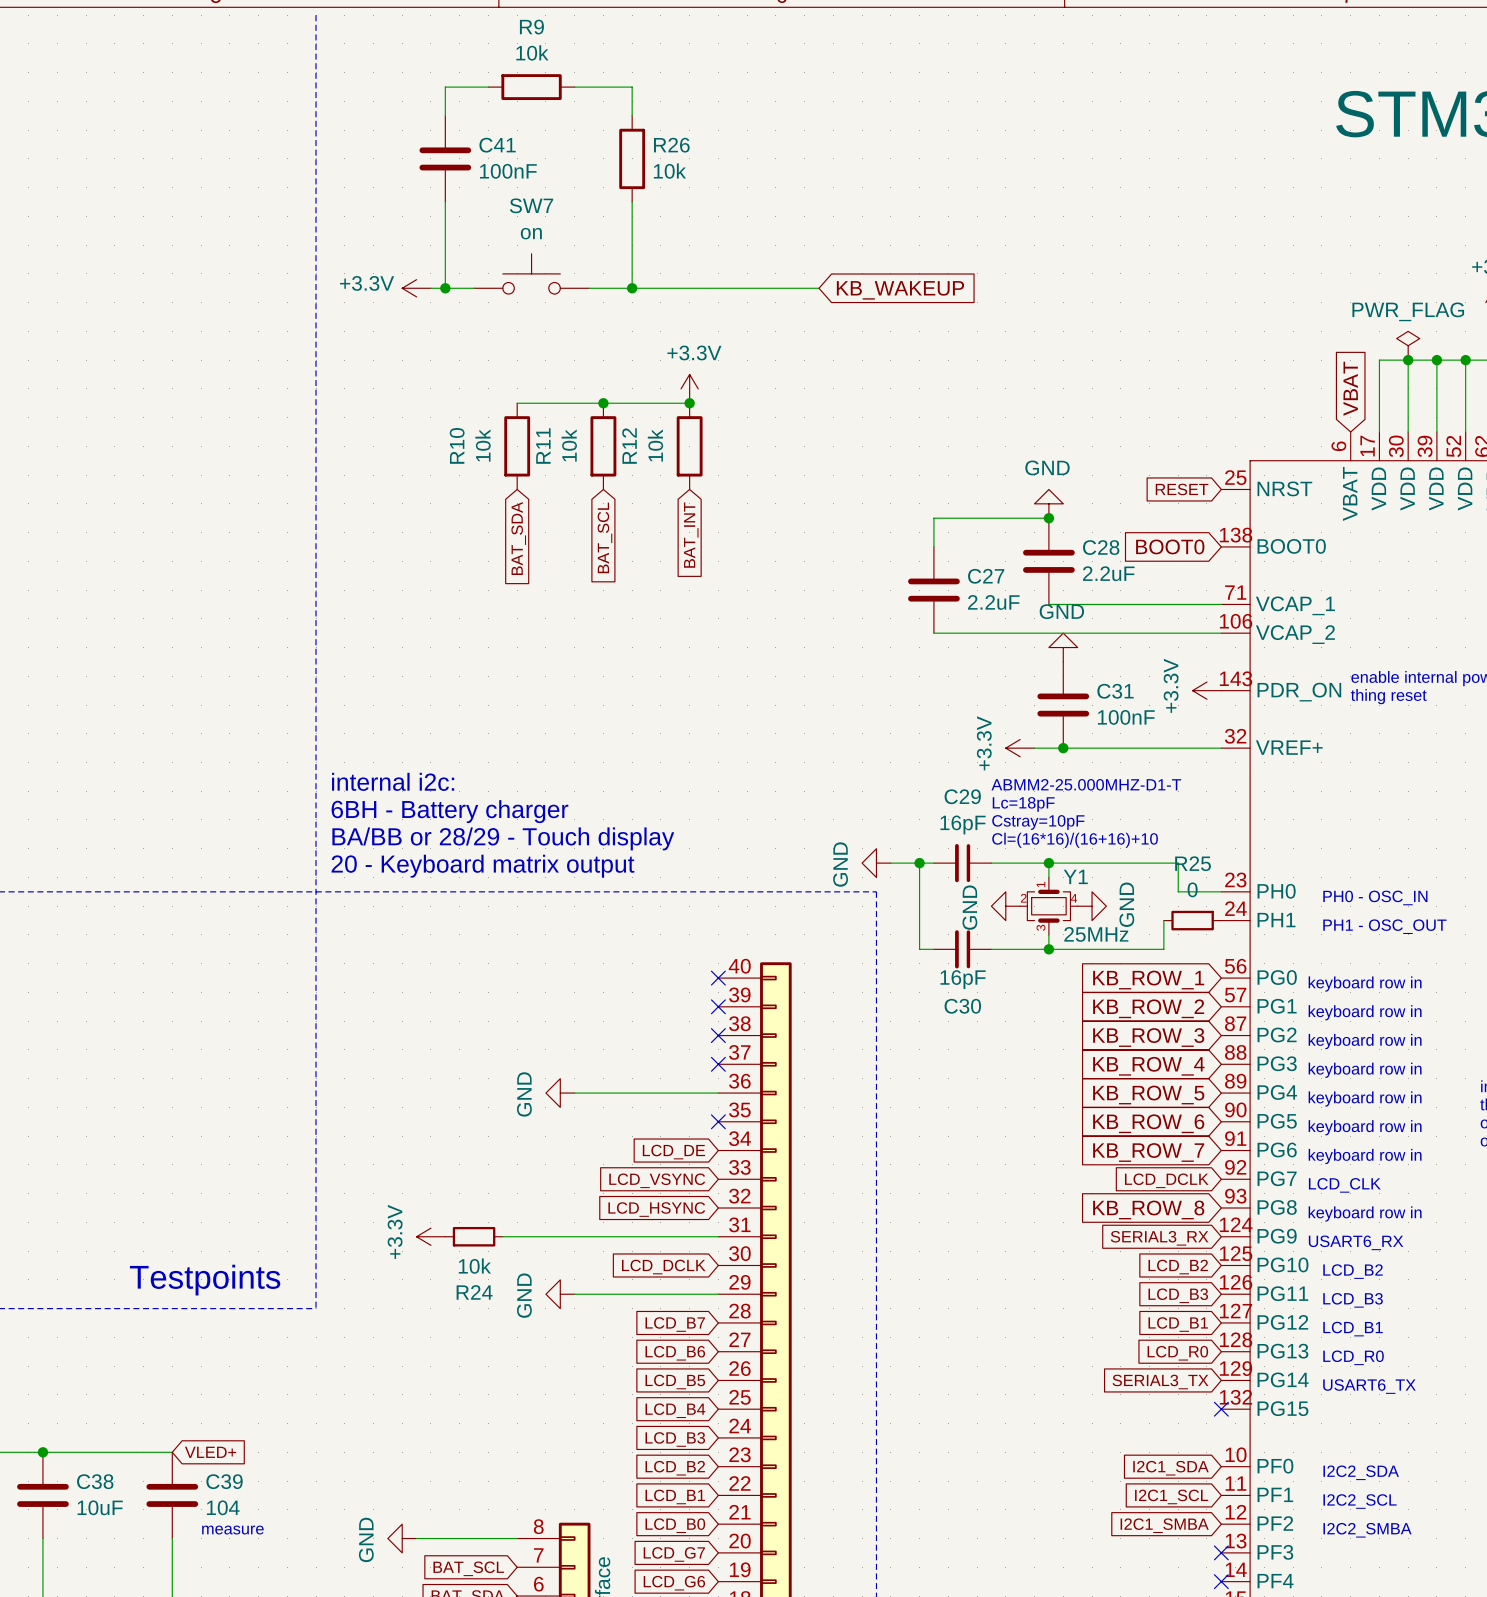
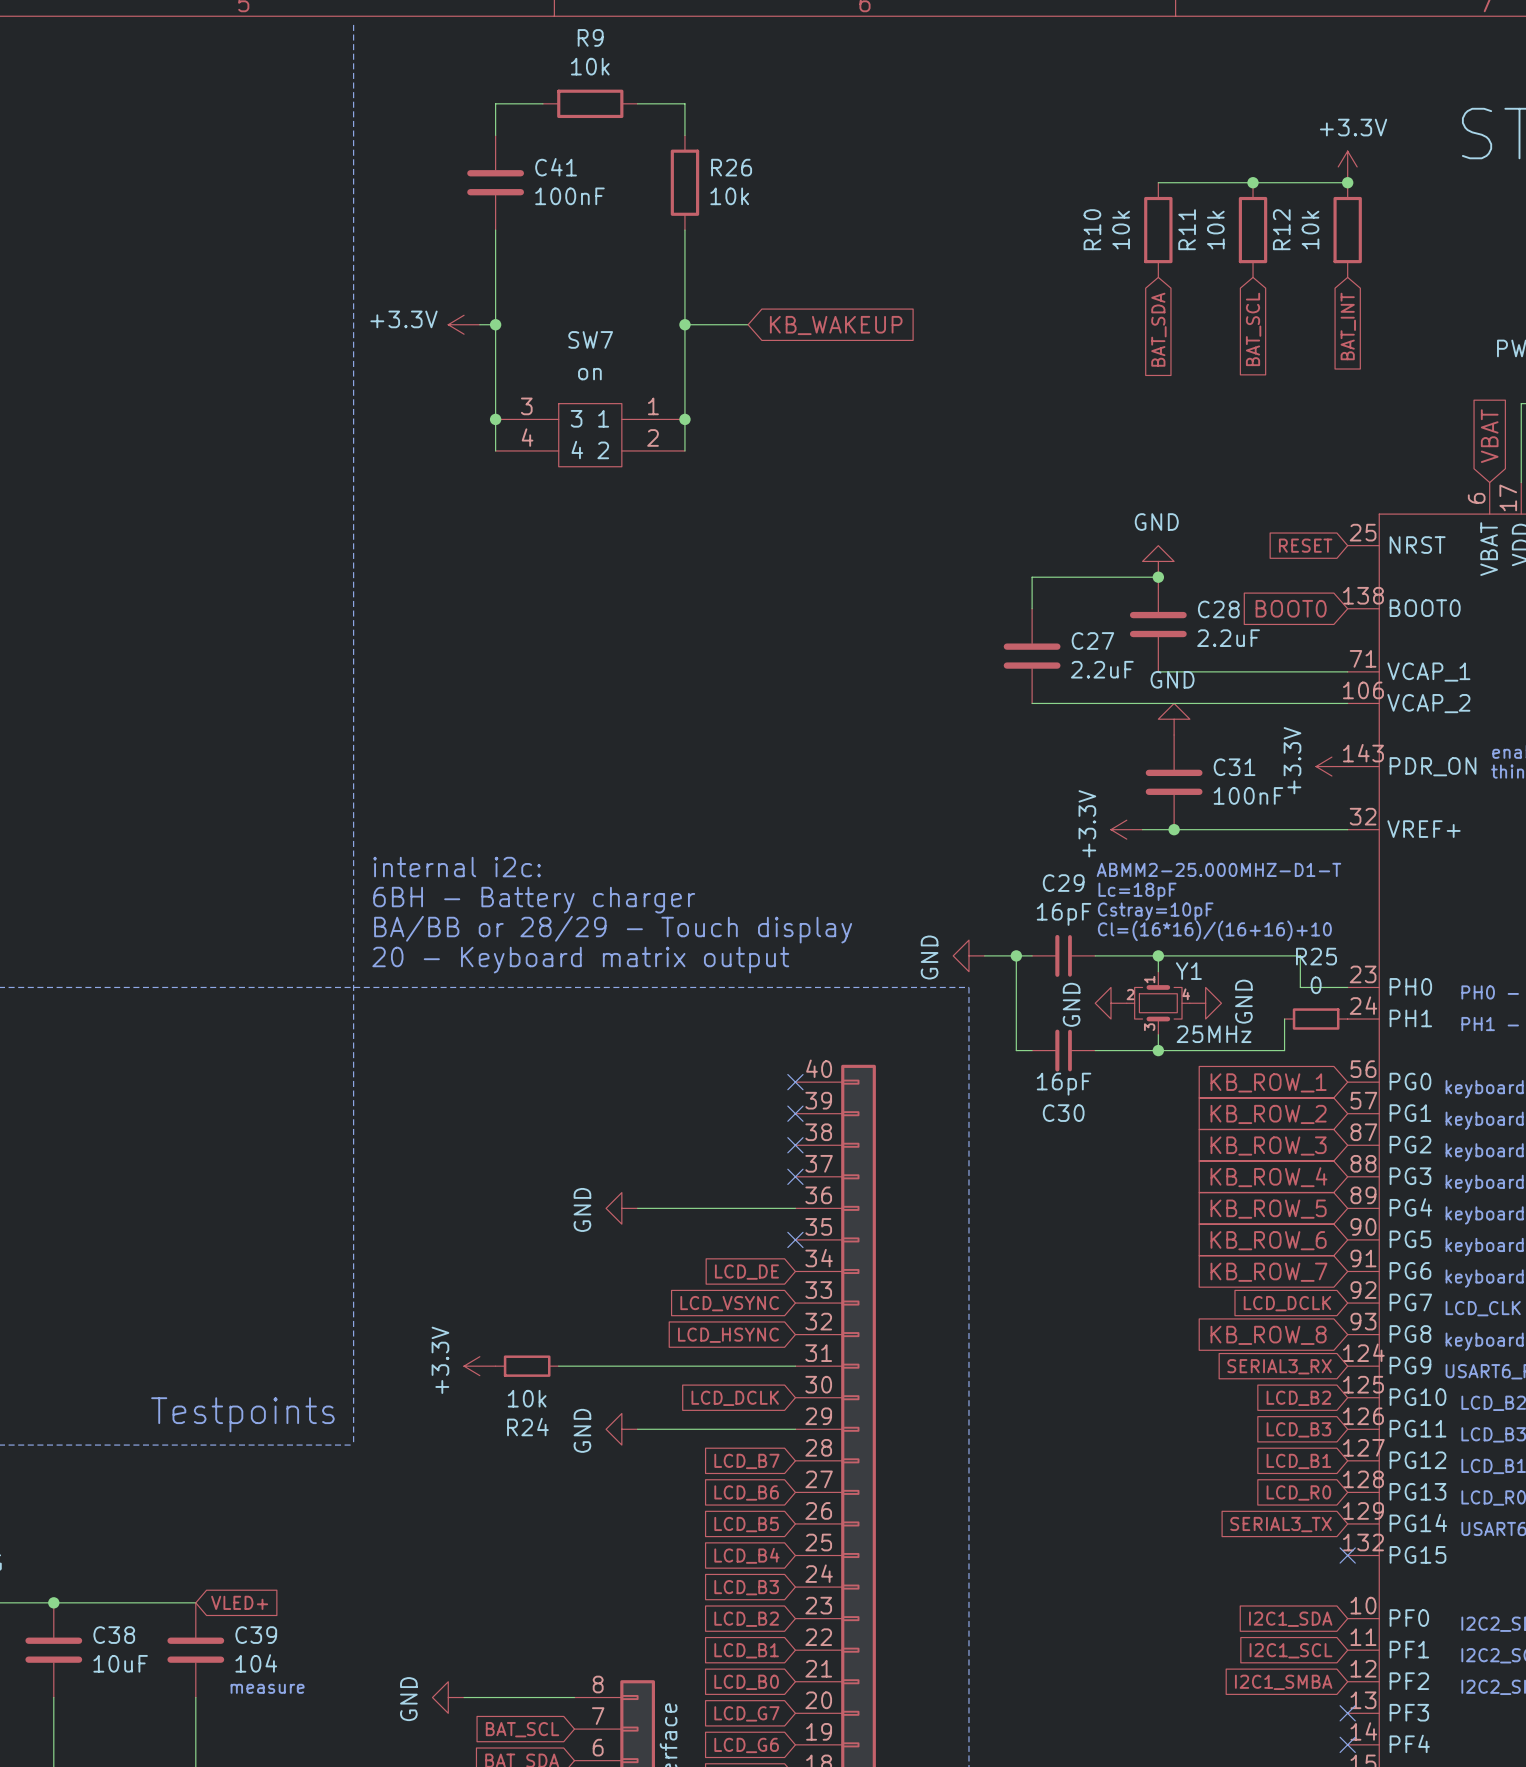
wire: (617, 87) (632, 87) (632, 115) -> (684, 103) (684, 135)
power symbol: none -> +3.3V (1347, 166)
R26 position: (632, 158) -> (684, 182)
wire: none -> (1158, 182) (1347, 182)
junction: none -> (1253, 182)
junction: none -> (1347, 182)
wire: none -> (684, 230) (684, 450)
wire: (632, 202) (632, 288) -> none
SW7 symbol: [474, 253, 590, 295] -> [495, 403, 685, 467]
wire: (445, 288) (474, 288) -> (495, 324) (495, 450)
wire: (589, 288) (617, 288) -> none
junction position: (632, 288) -> (684, 324)
wire: (675, 288) (818, 288) -> none
global label position: KB_WAKEUP (900, 290) -> KB_WAKEUP (836, 325)
global label: none -> BAT_INT (1348, 326)
global label: none -> BAT_SCL (1253, 329)
global label: none -> BAT_SDA (1158, 329)
junction: none -> (495, 419)
power symbol: +3.3V (689, 388) -> none
wire: (517, 403) (689, 403) -> none
junction position: (603, 403) -> (684, 419)
junction: (689, 403) -> none
R10 position: (517, 446) -> (1158, 230)
R11 position: (603, 446) -> (1253, 230)
R12 position: (689, 446) -> (1347, 230)
global label: BAT_INT (691, 535) -> none
global label: BAT_SCL (604, 537) -> none
global label: BAT_SDA (518, 538) -> none

